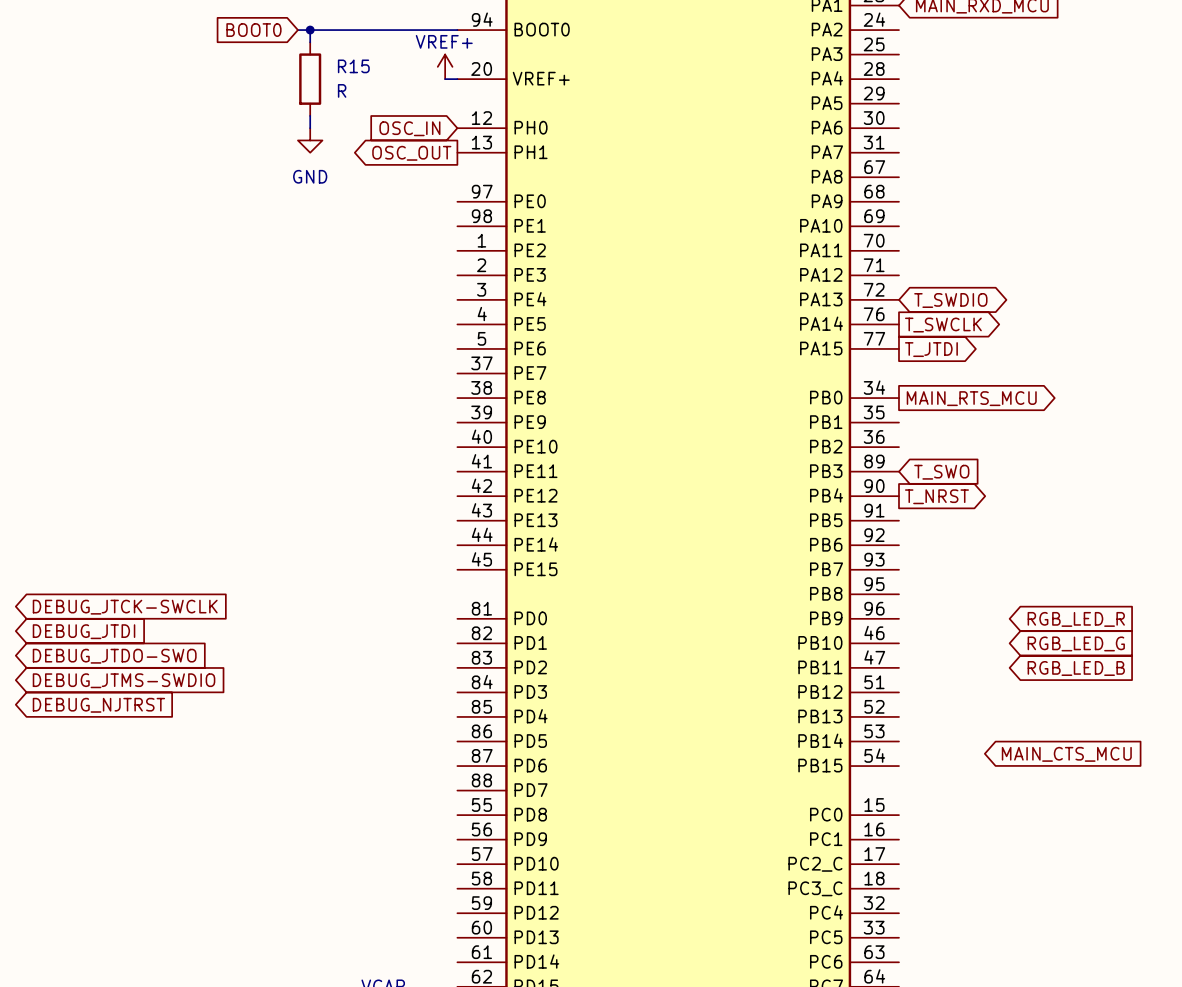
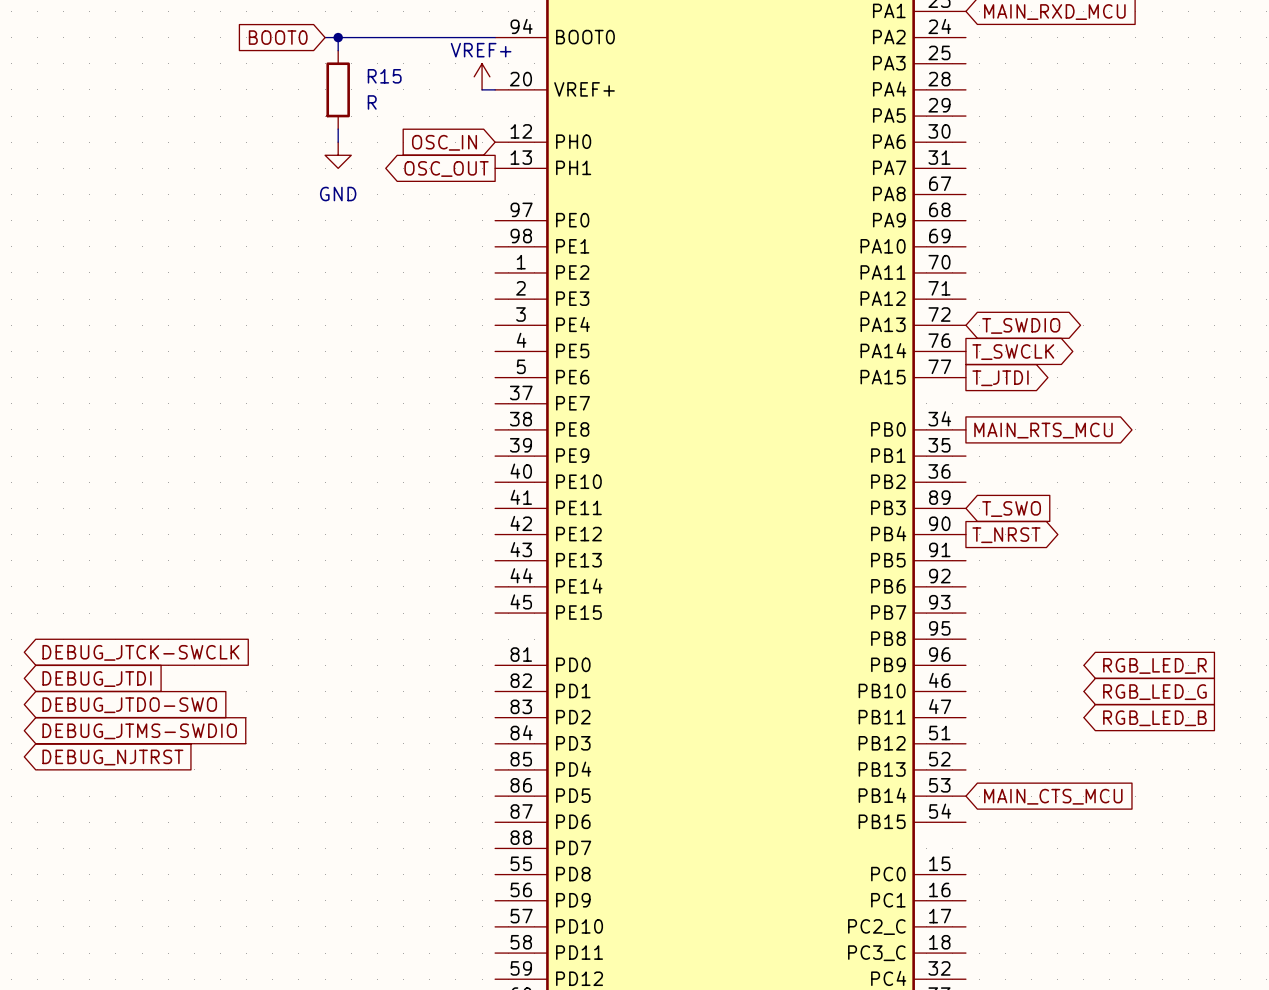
global label position: MAIN_CTS_MCU (1066, 754) -> MAIN_CTS_MCU (1053, 796)

